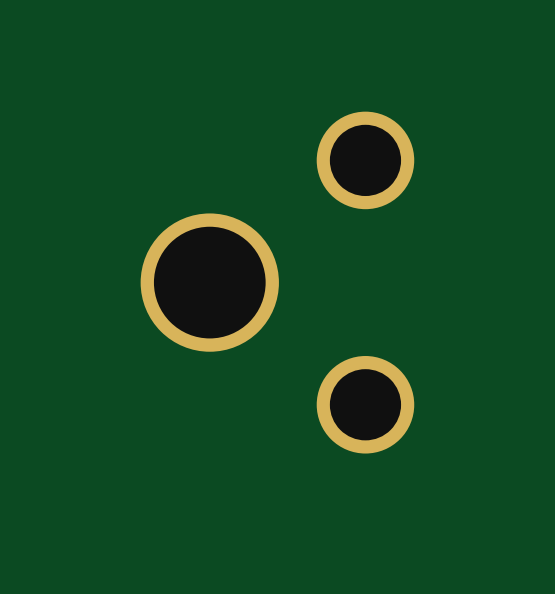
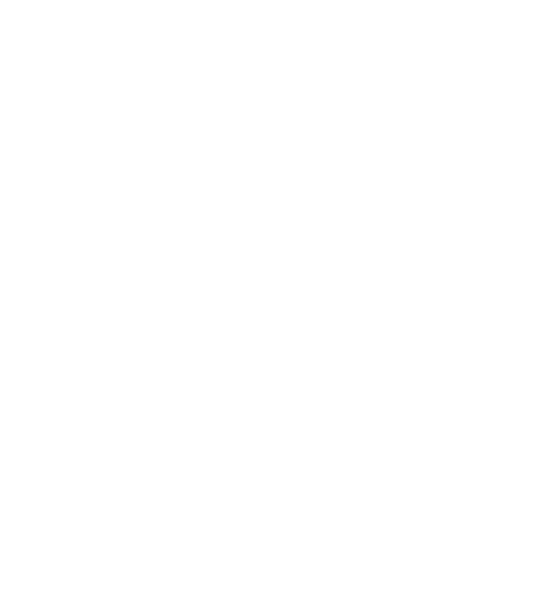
part: (277, 282) -> none

